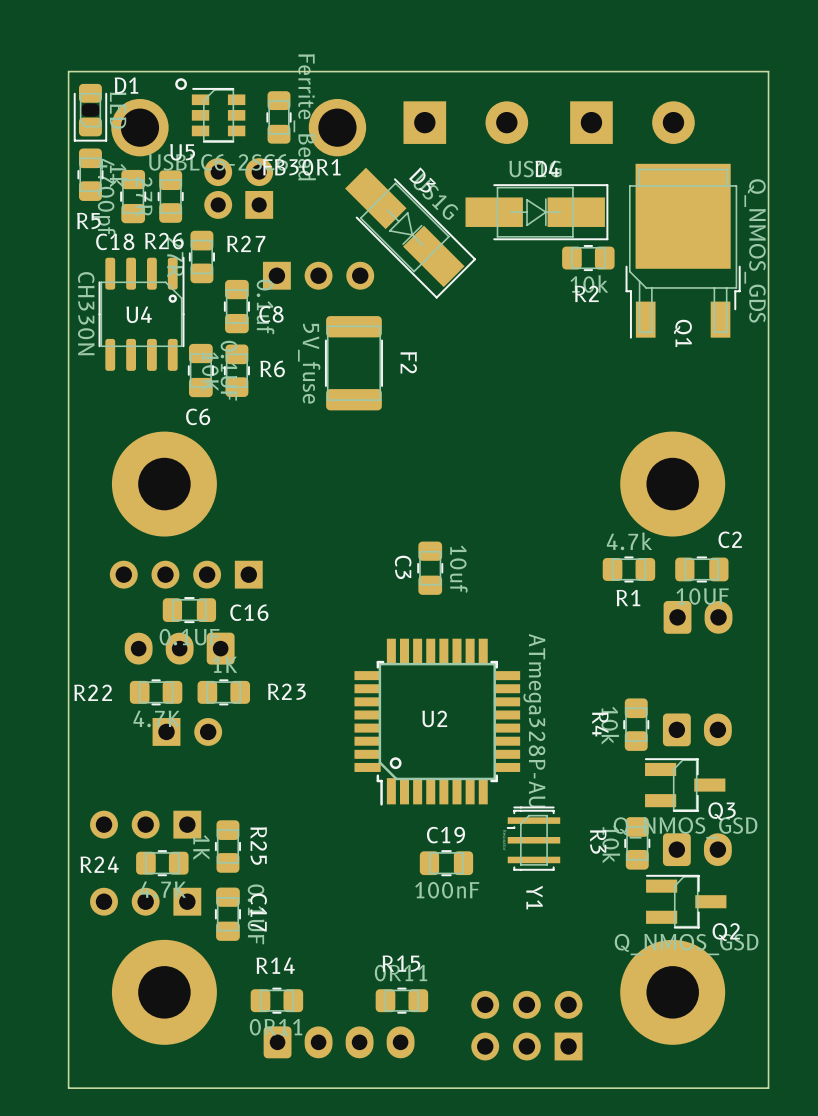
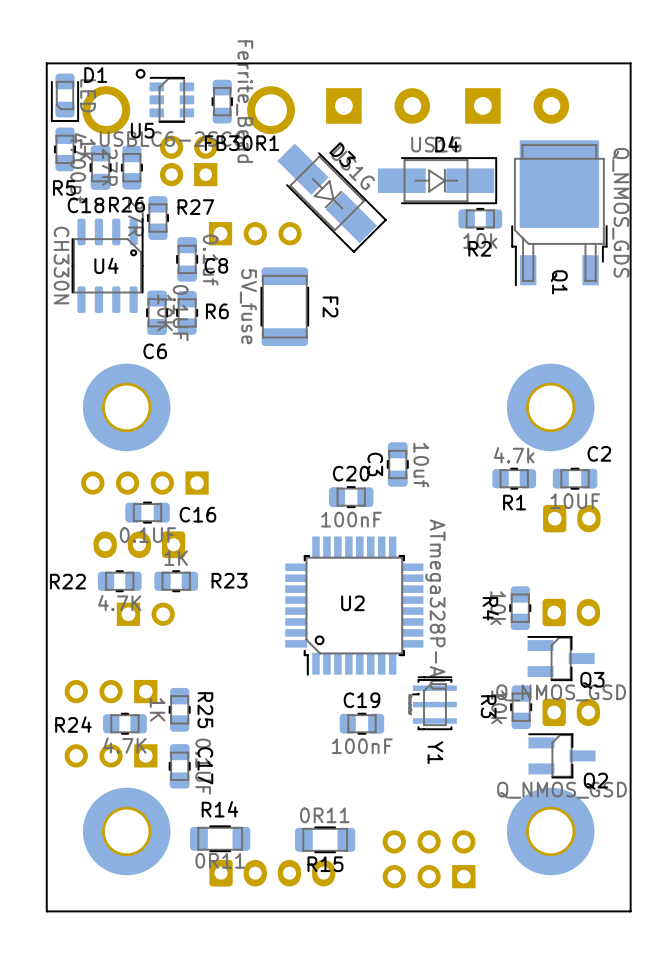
C3 position: (430, 568) -> (397, 464)
C20: none -> 100nF (351, 497)
R15 name position: R15 (401, 963) -> R15 (325, 864)
R14 footprint: [250, 987, 304, 1014] -> [190, 825, 251, 853]
R15 footprint: [375, 987, 429, 1014] -> [295, 826, 356, 854]

